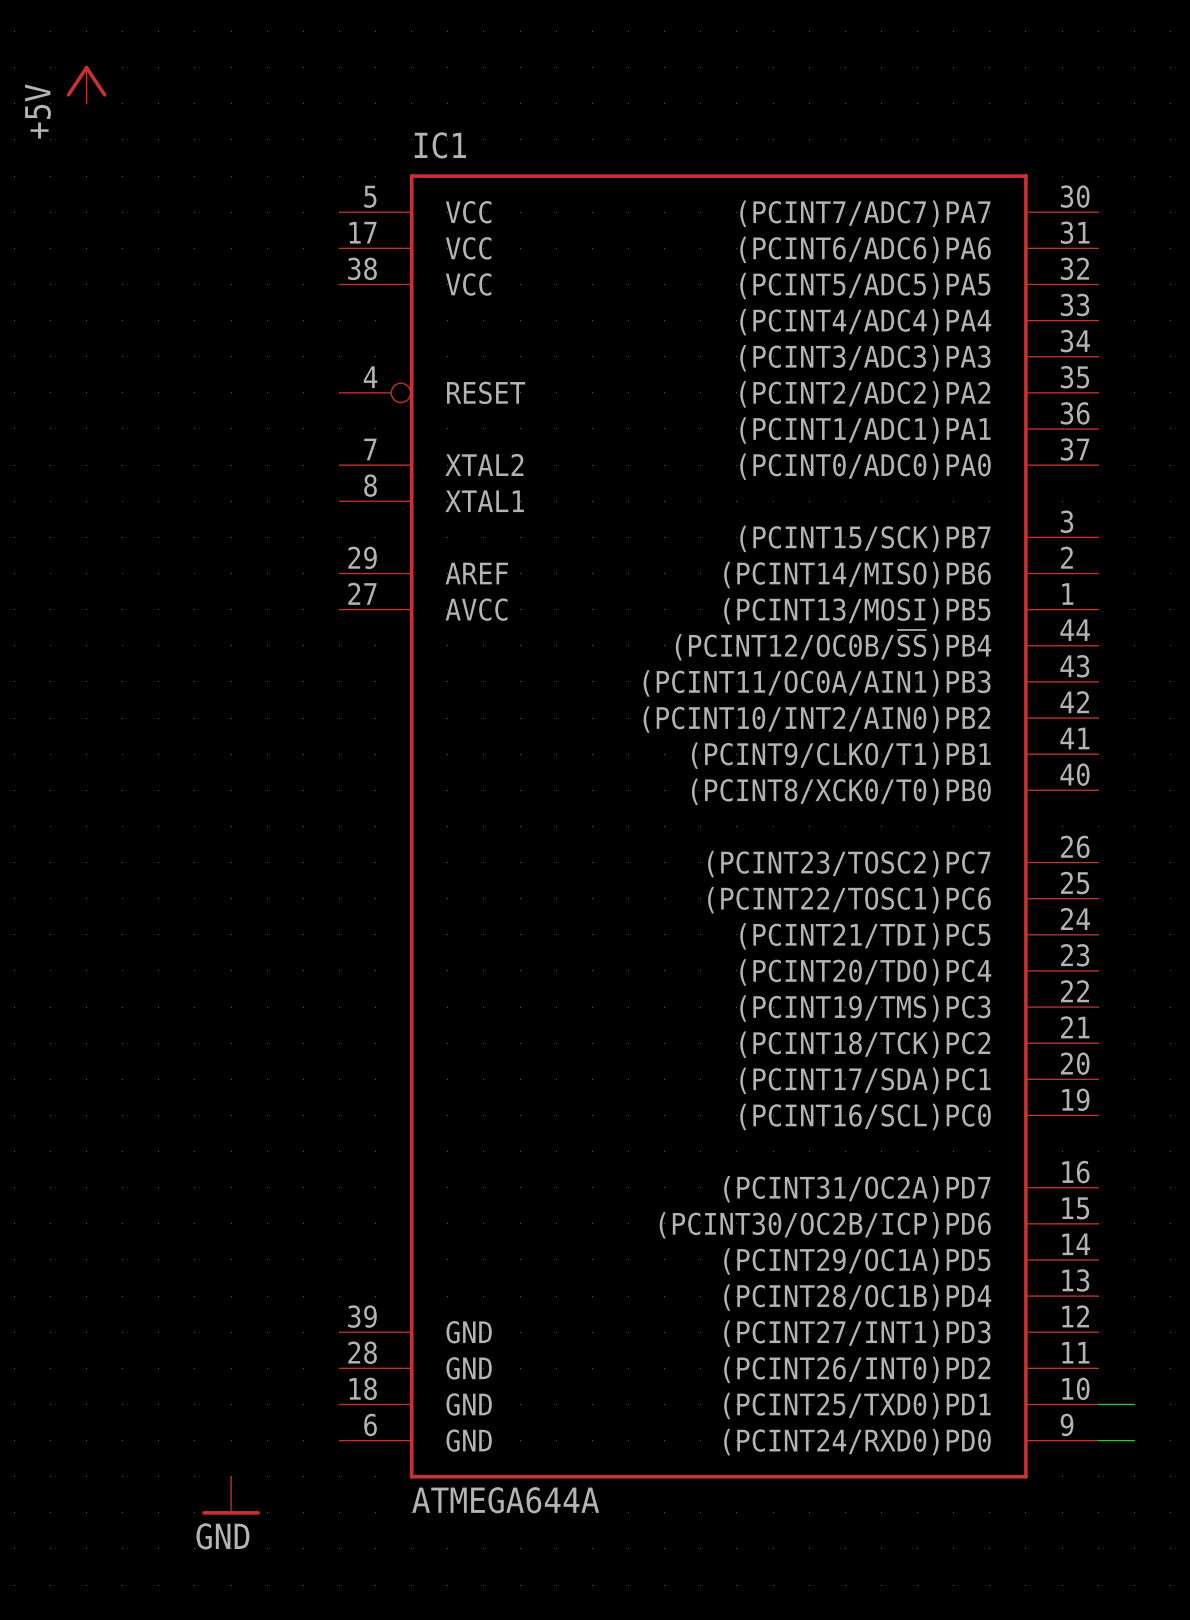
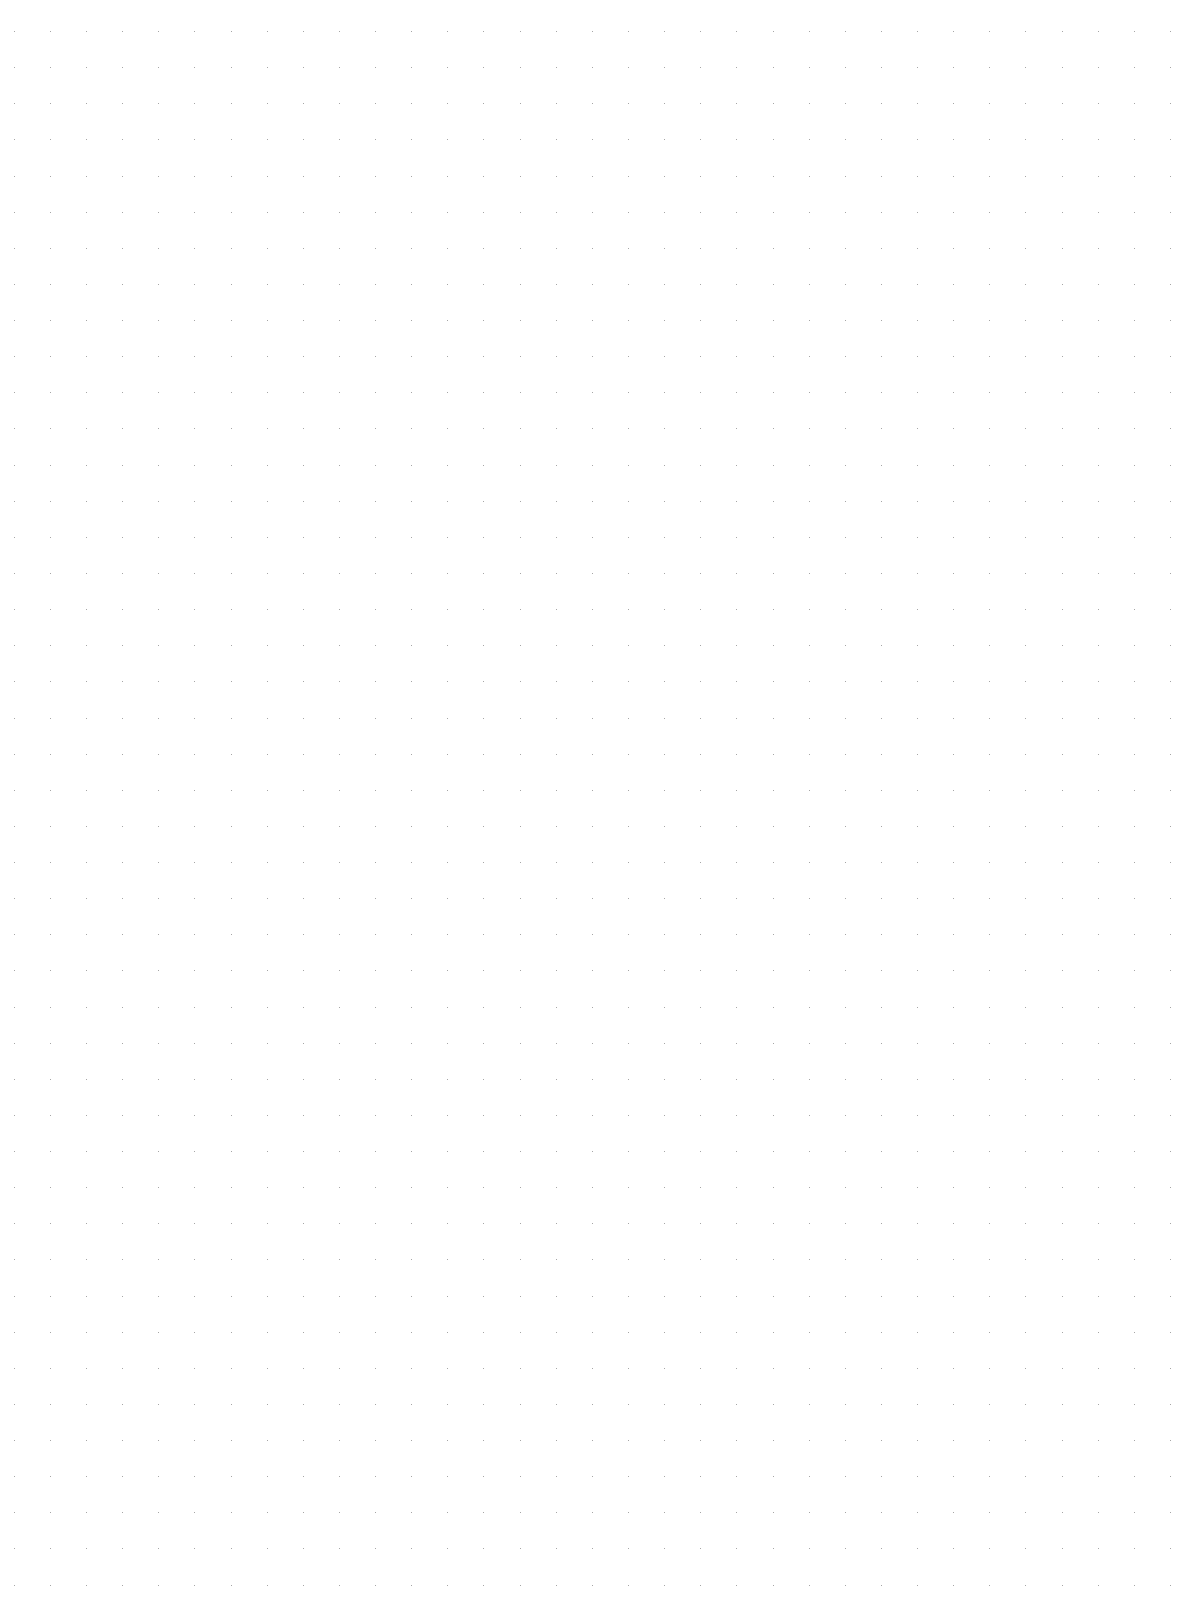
power symbol: +5V (86, 84) -> none
IC1: ATMEGA644A (718, 826) -> none
wire: (1098, 1404) (1134, 1404) -> none
wire: (1098, 1440) (1134, 1440) -> none
power symbol: GND (231, 1495) -> none

